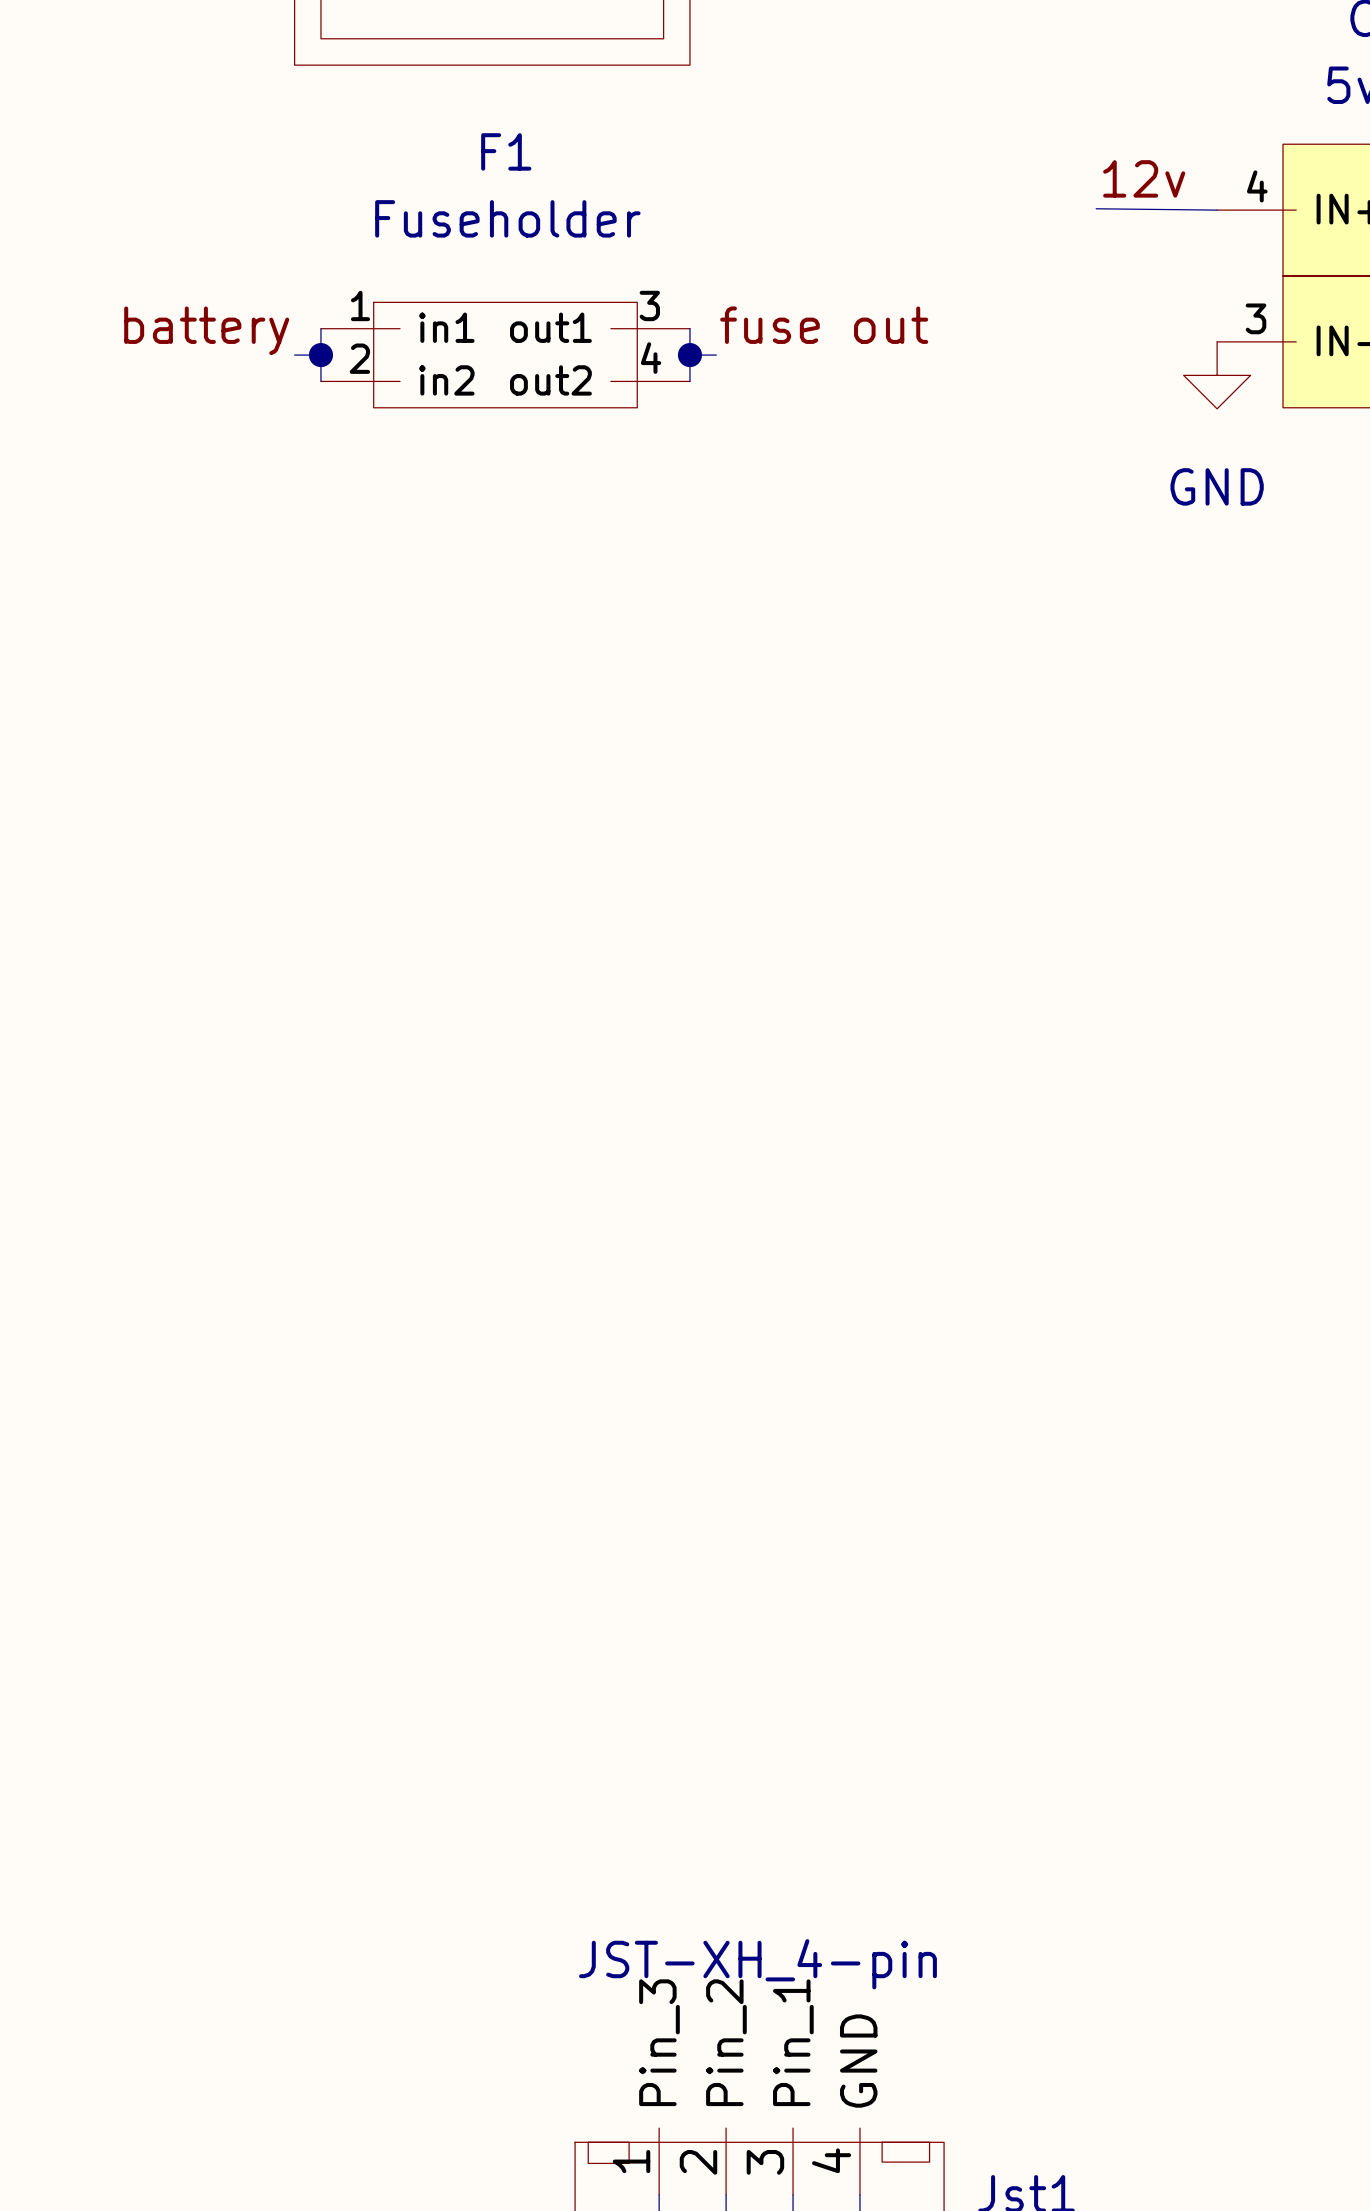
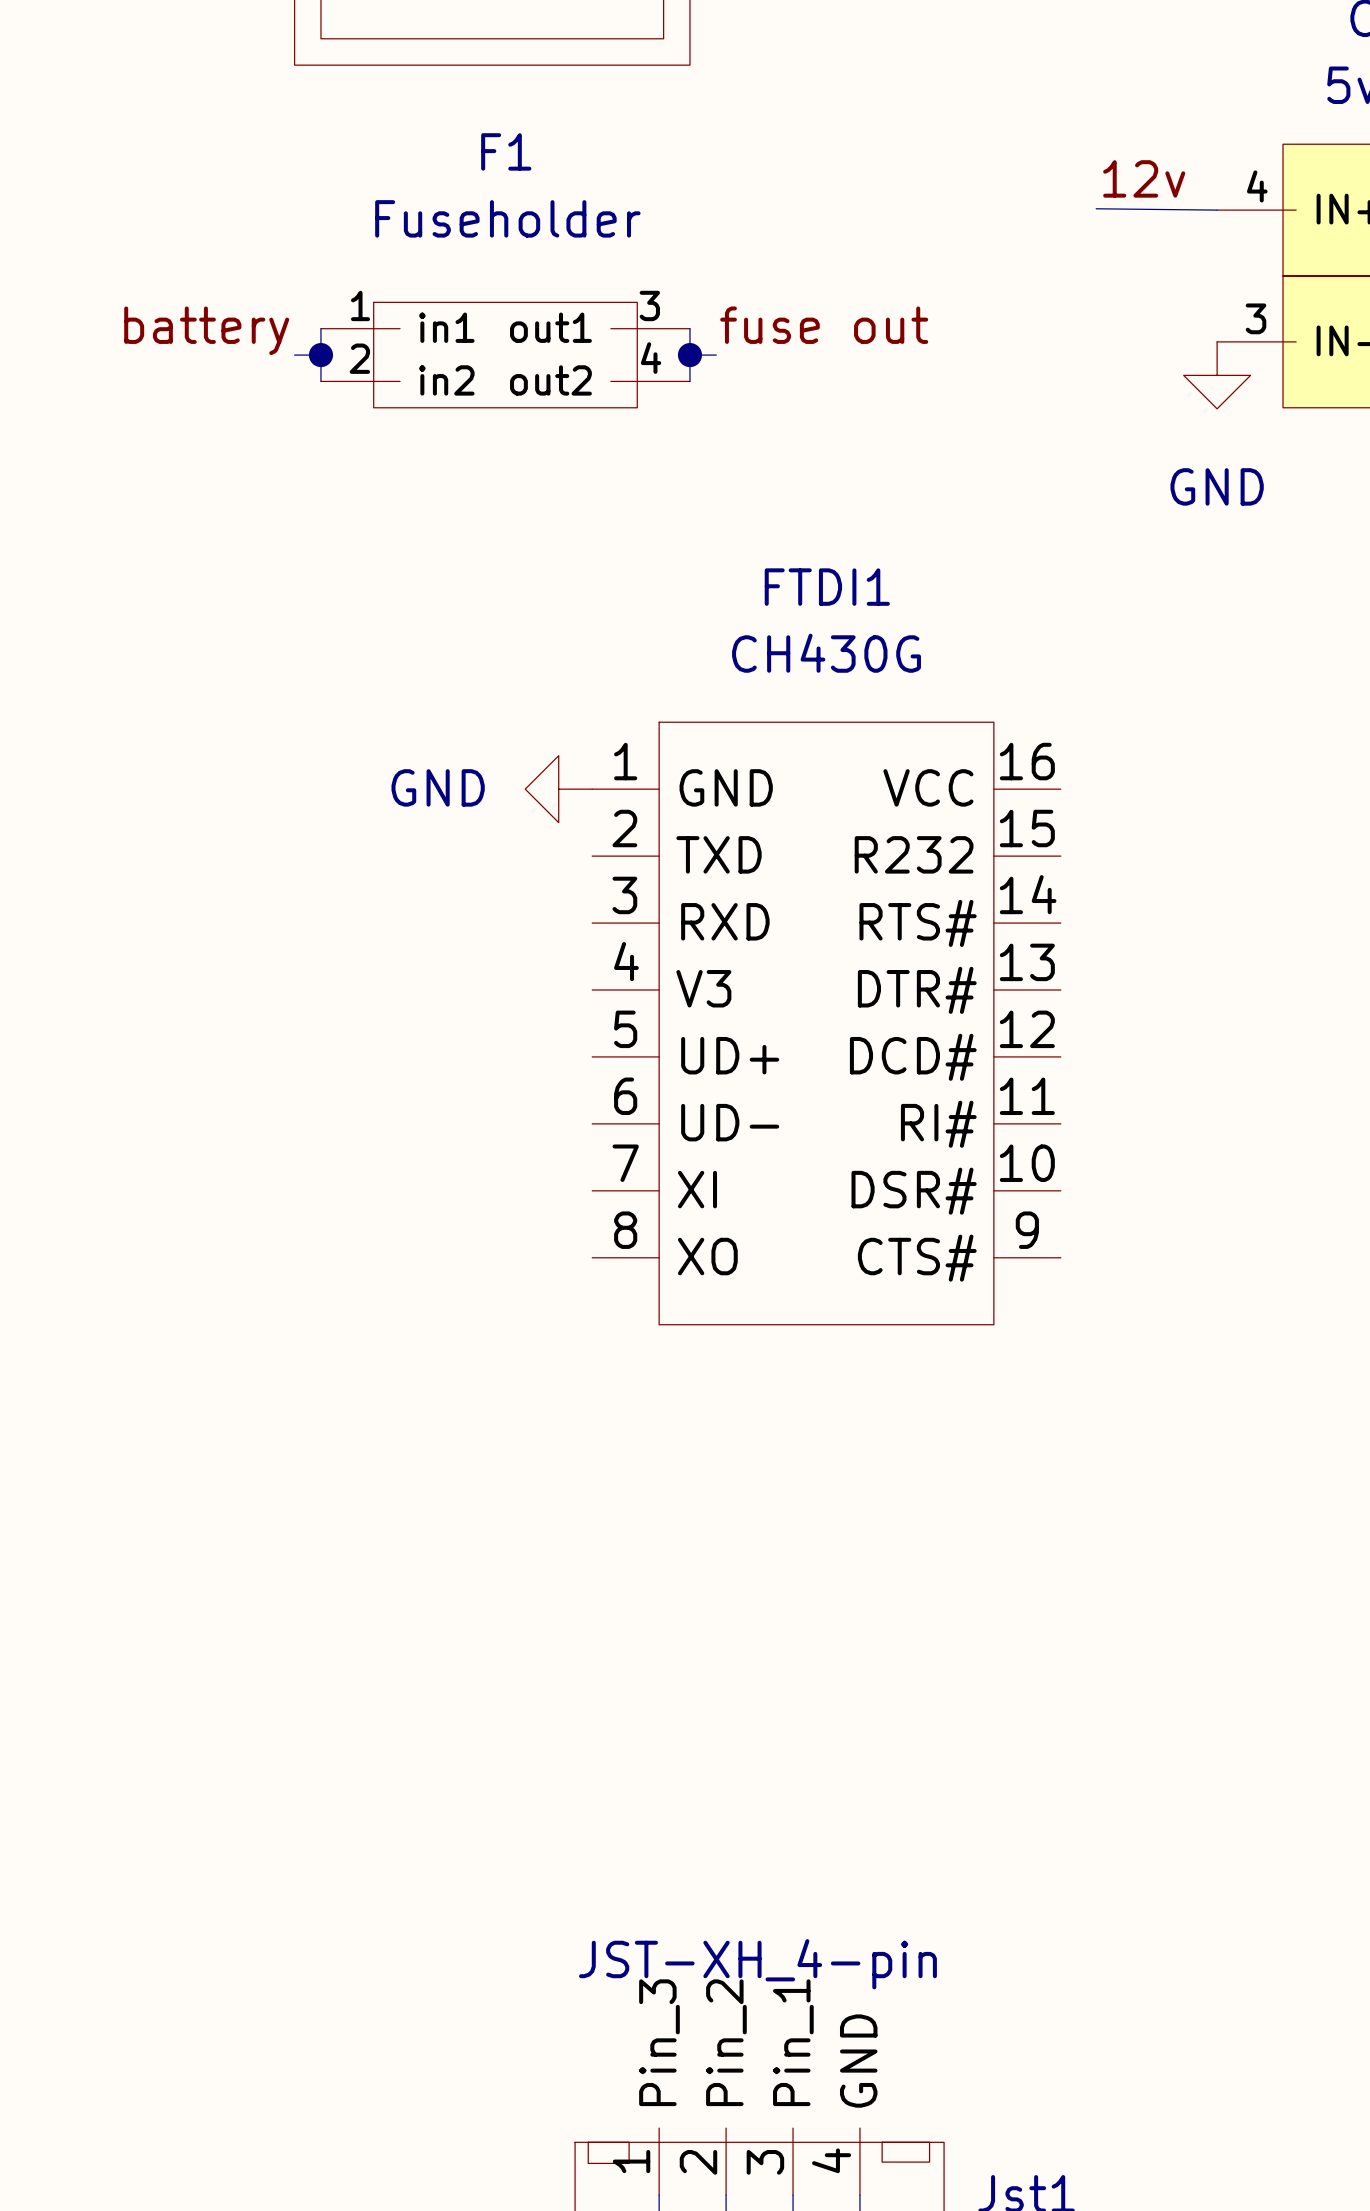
power symbol: none -> GND (558, 789)
FTDI1: none -> CH430G (826, 1023)

